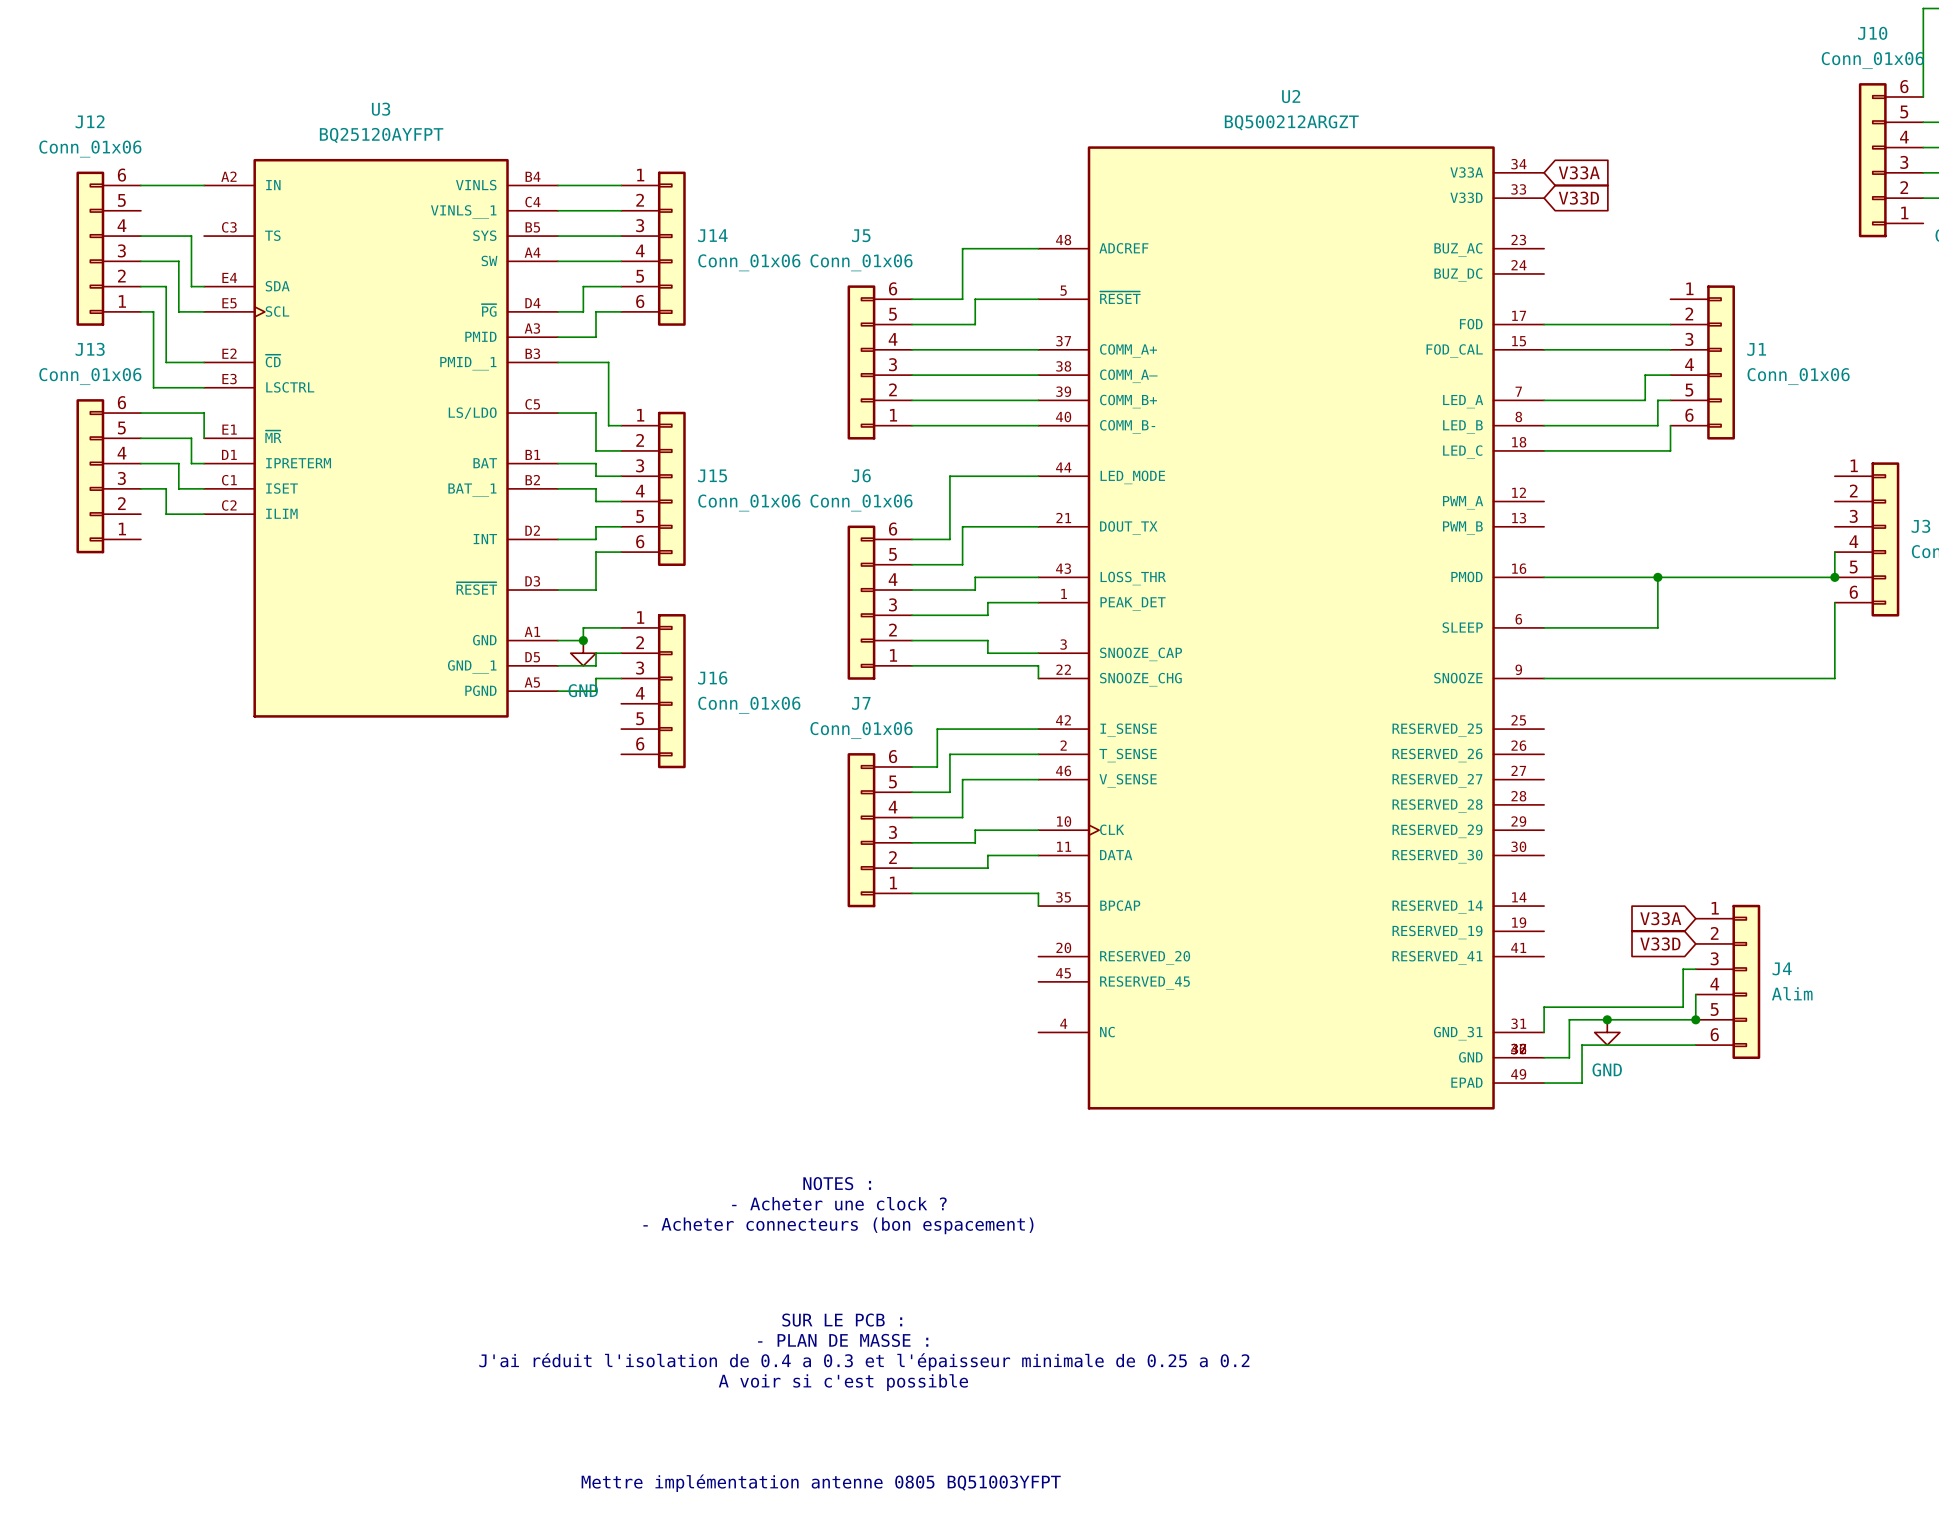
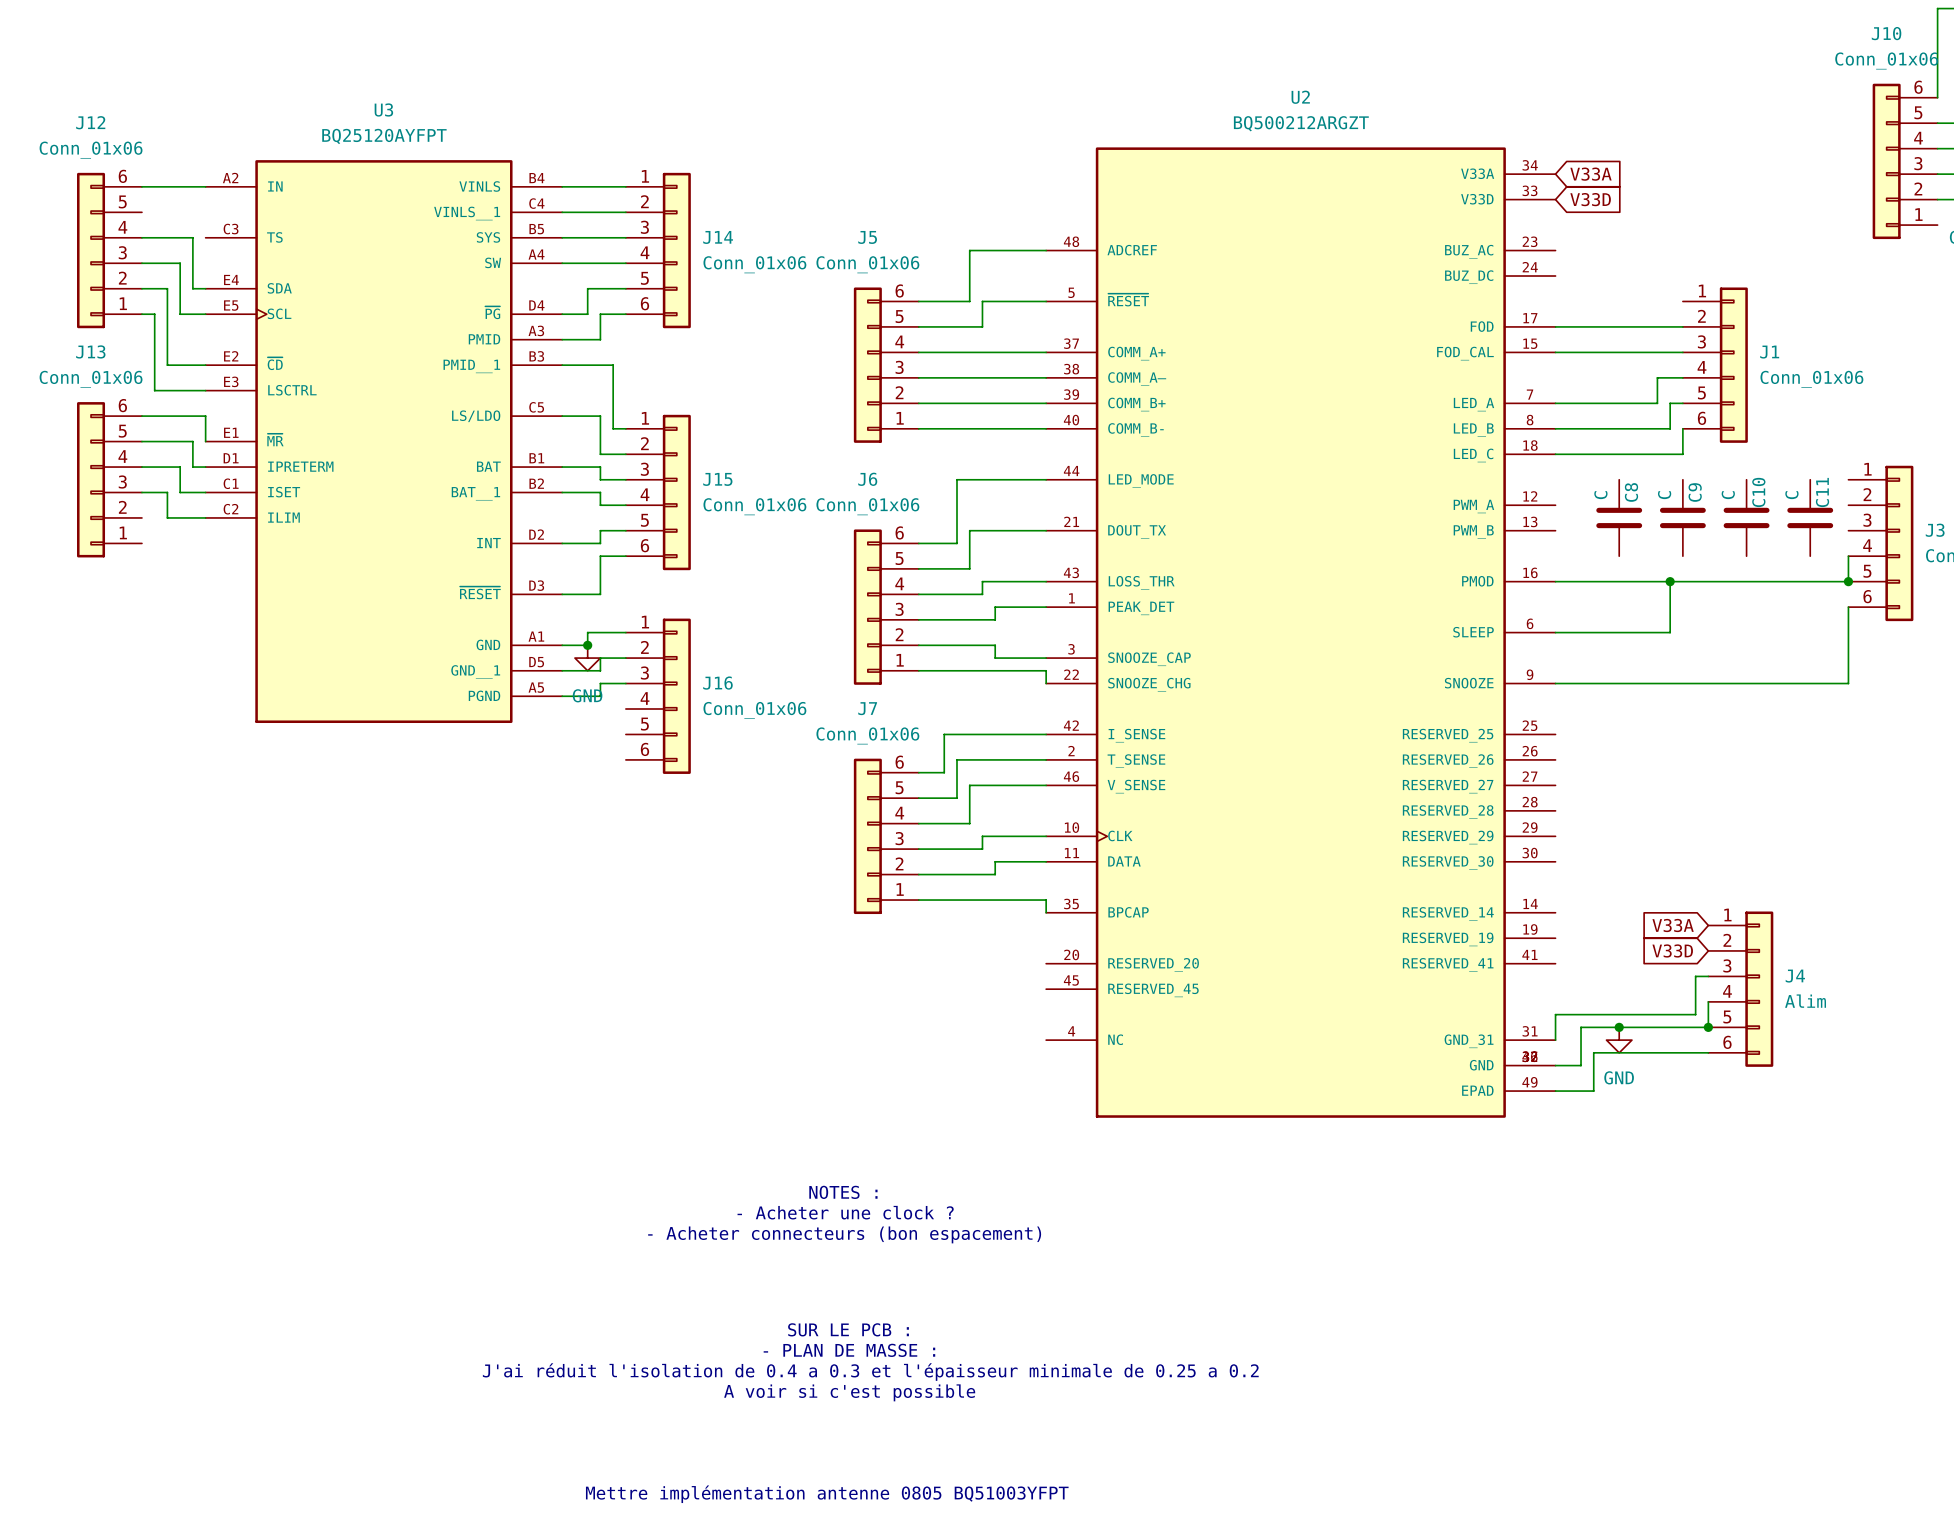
C8: none -> C (1619, 517)
C9: none -> C (1682, 517)
C10: none -> C (1746, 517)
C11: none -> C (1810, 517)

